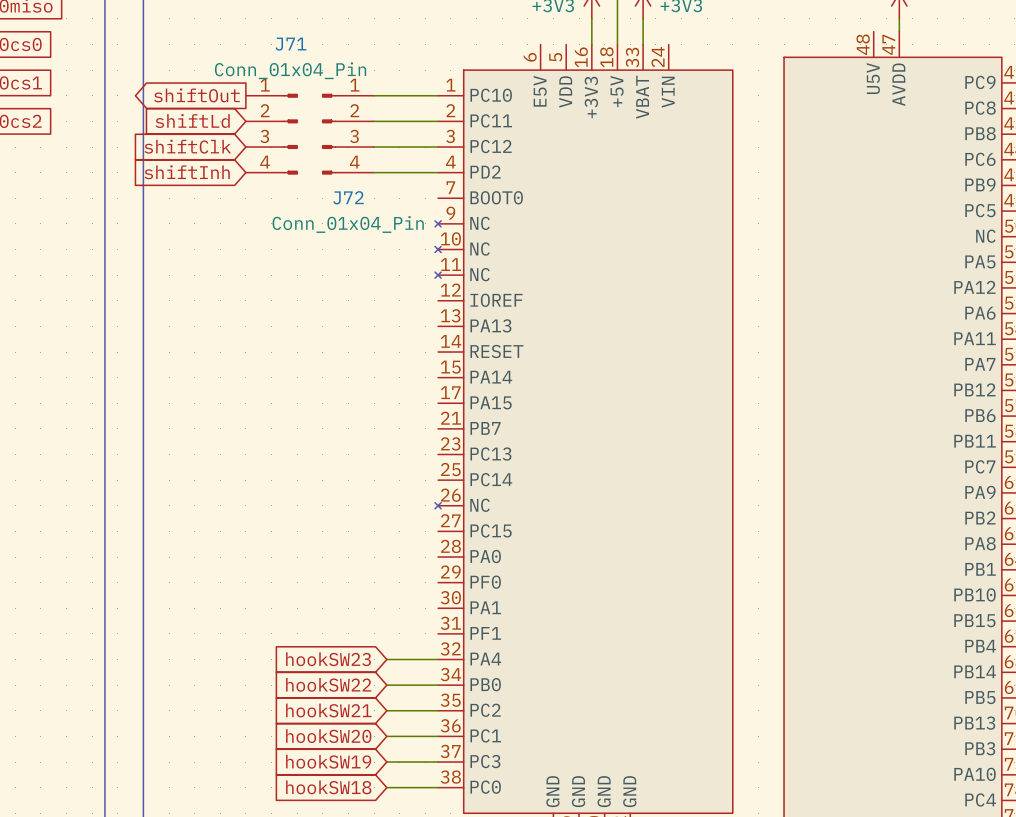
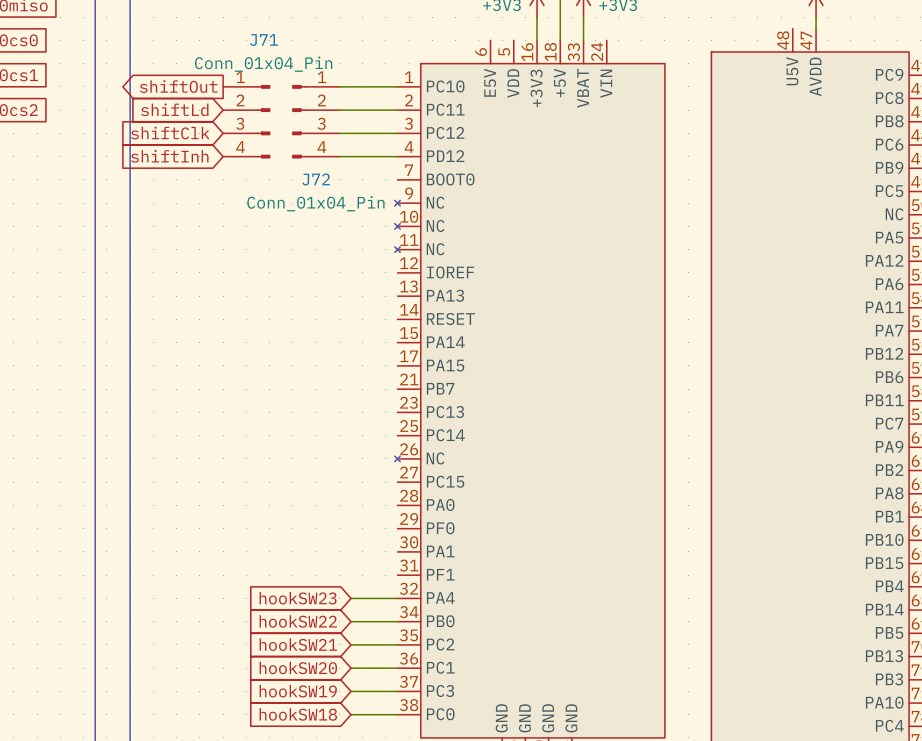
part pin name: PD2 (485, 172) -> PD12 (445, 156)

